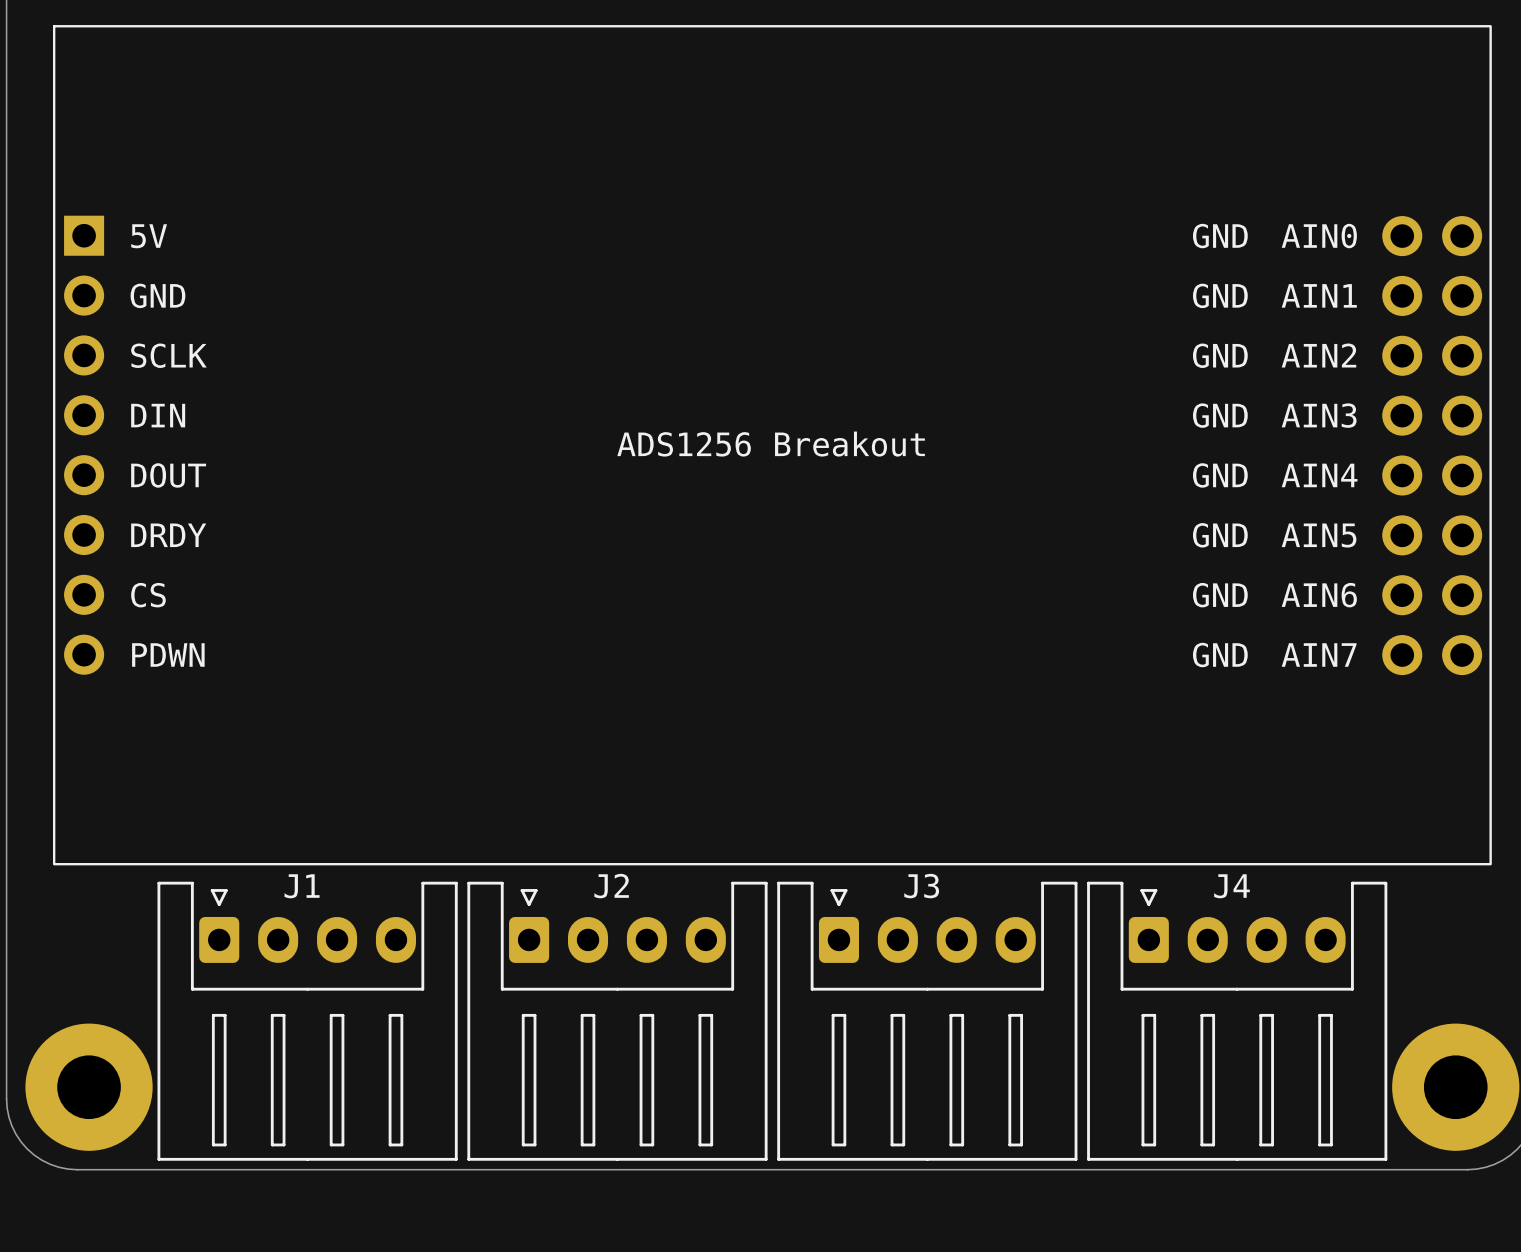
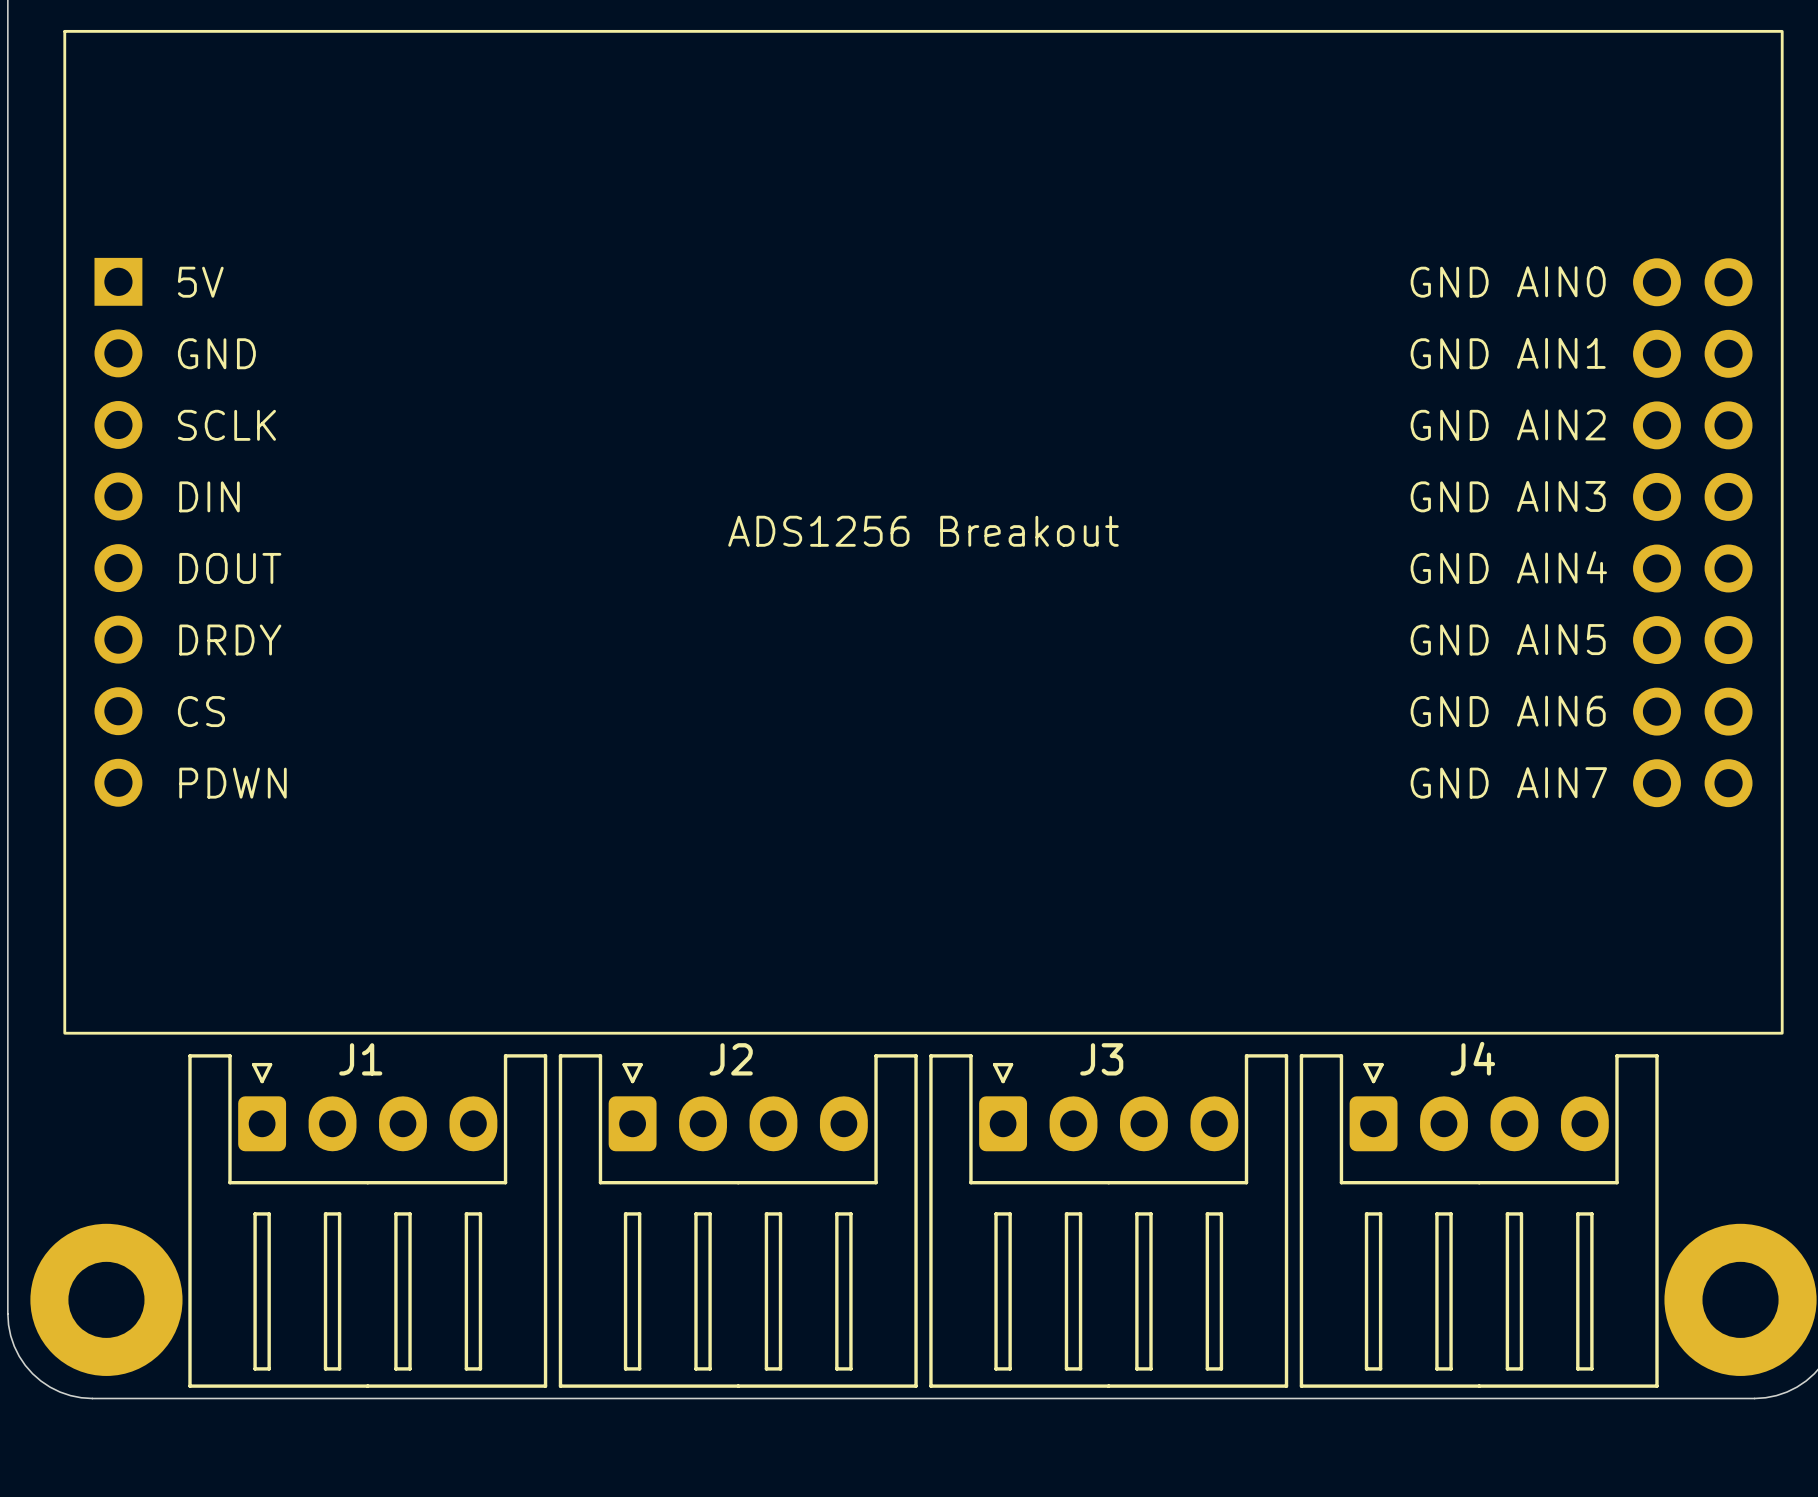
ADS1256 Breakout footprint: [52, 25, 1492, 866] -> [63, 29, 1784, 1035]

